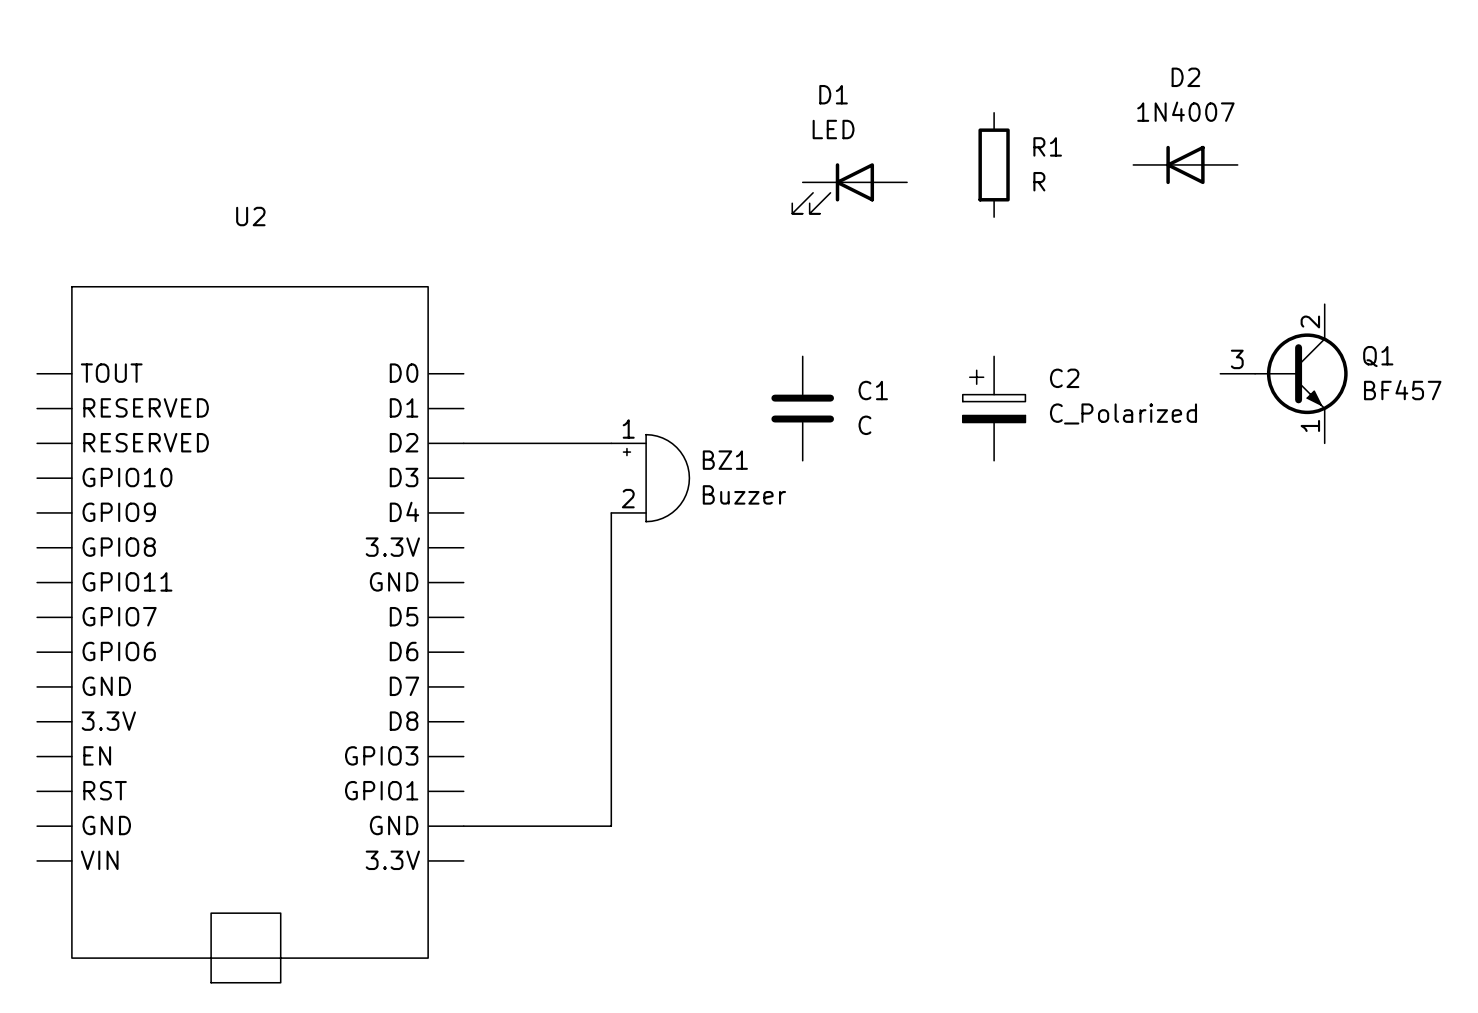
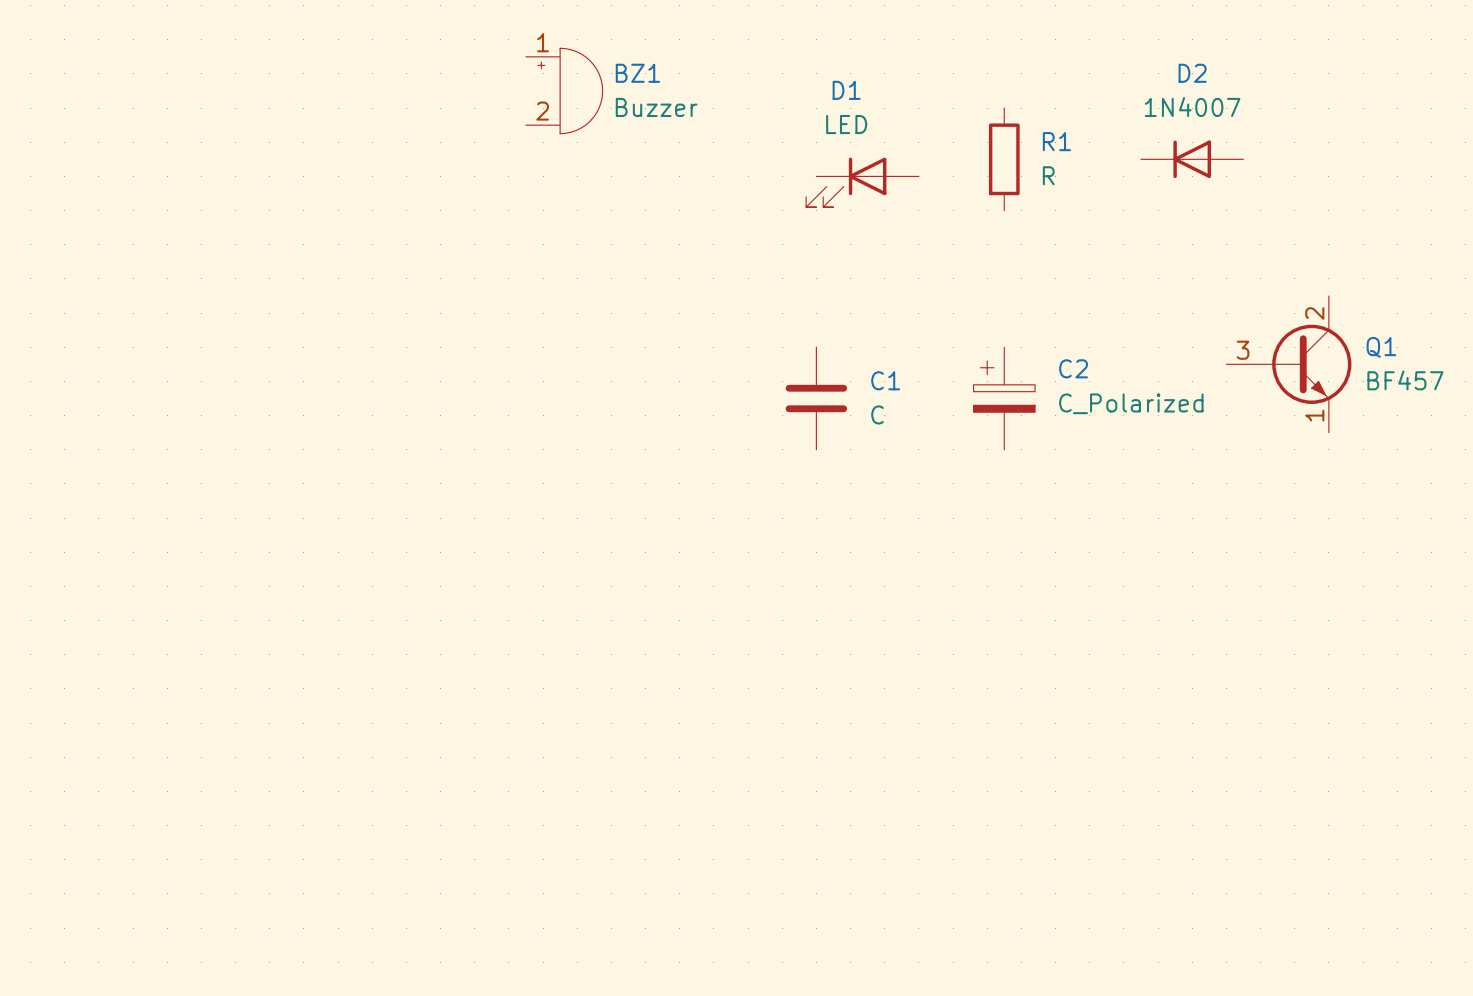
wire: (463, 443) (611, 443) -> none
BZ1 position: (650, 478) -> (564, 91)
wire: (611, 512) (611, 826) (463, 826) -> none
U2: (250, 634) -> none

